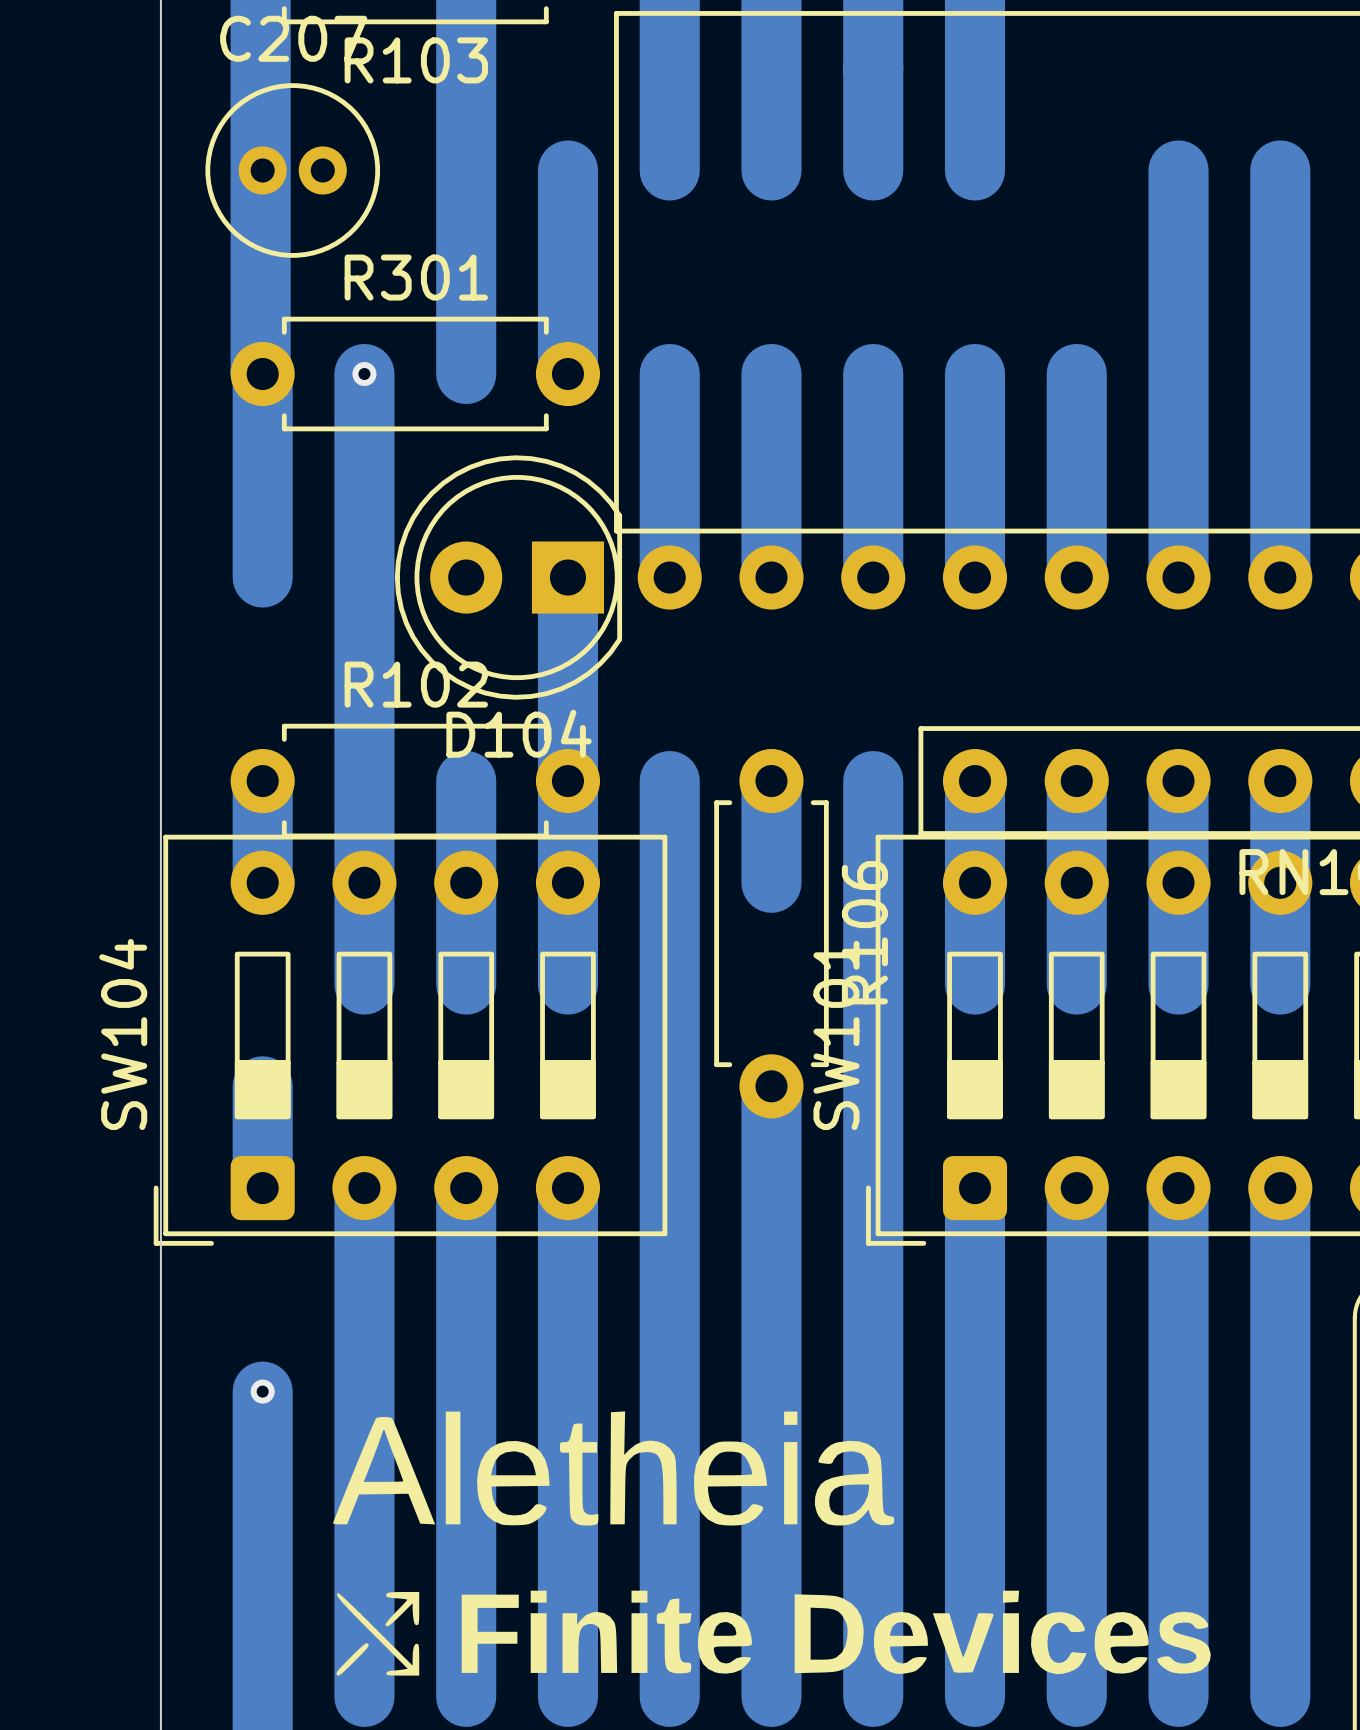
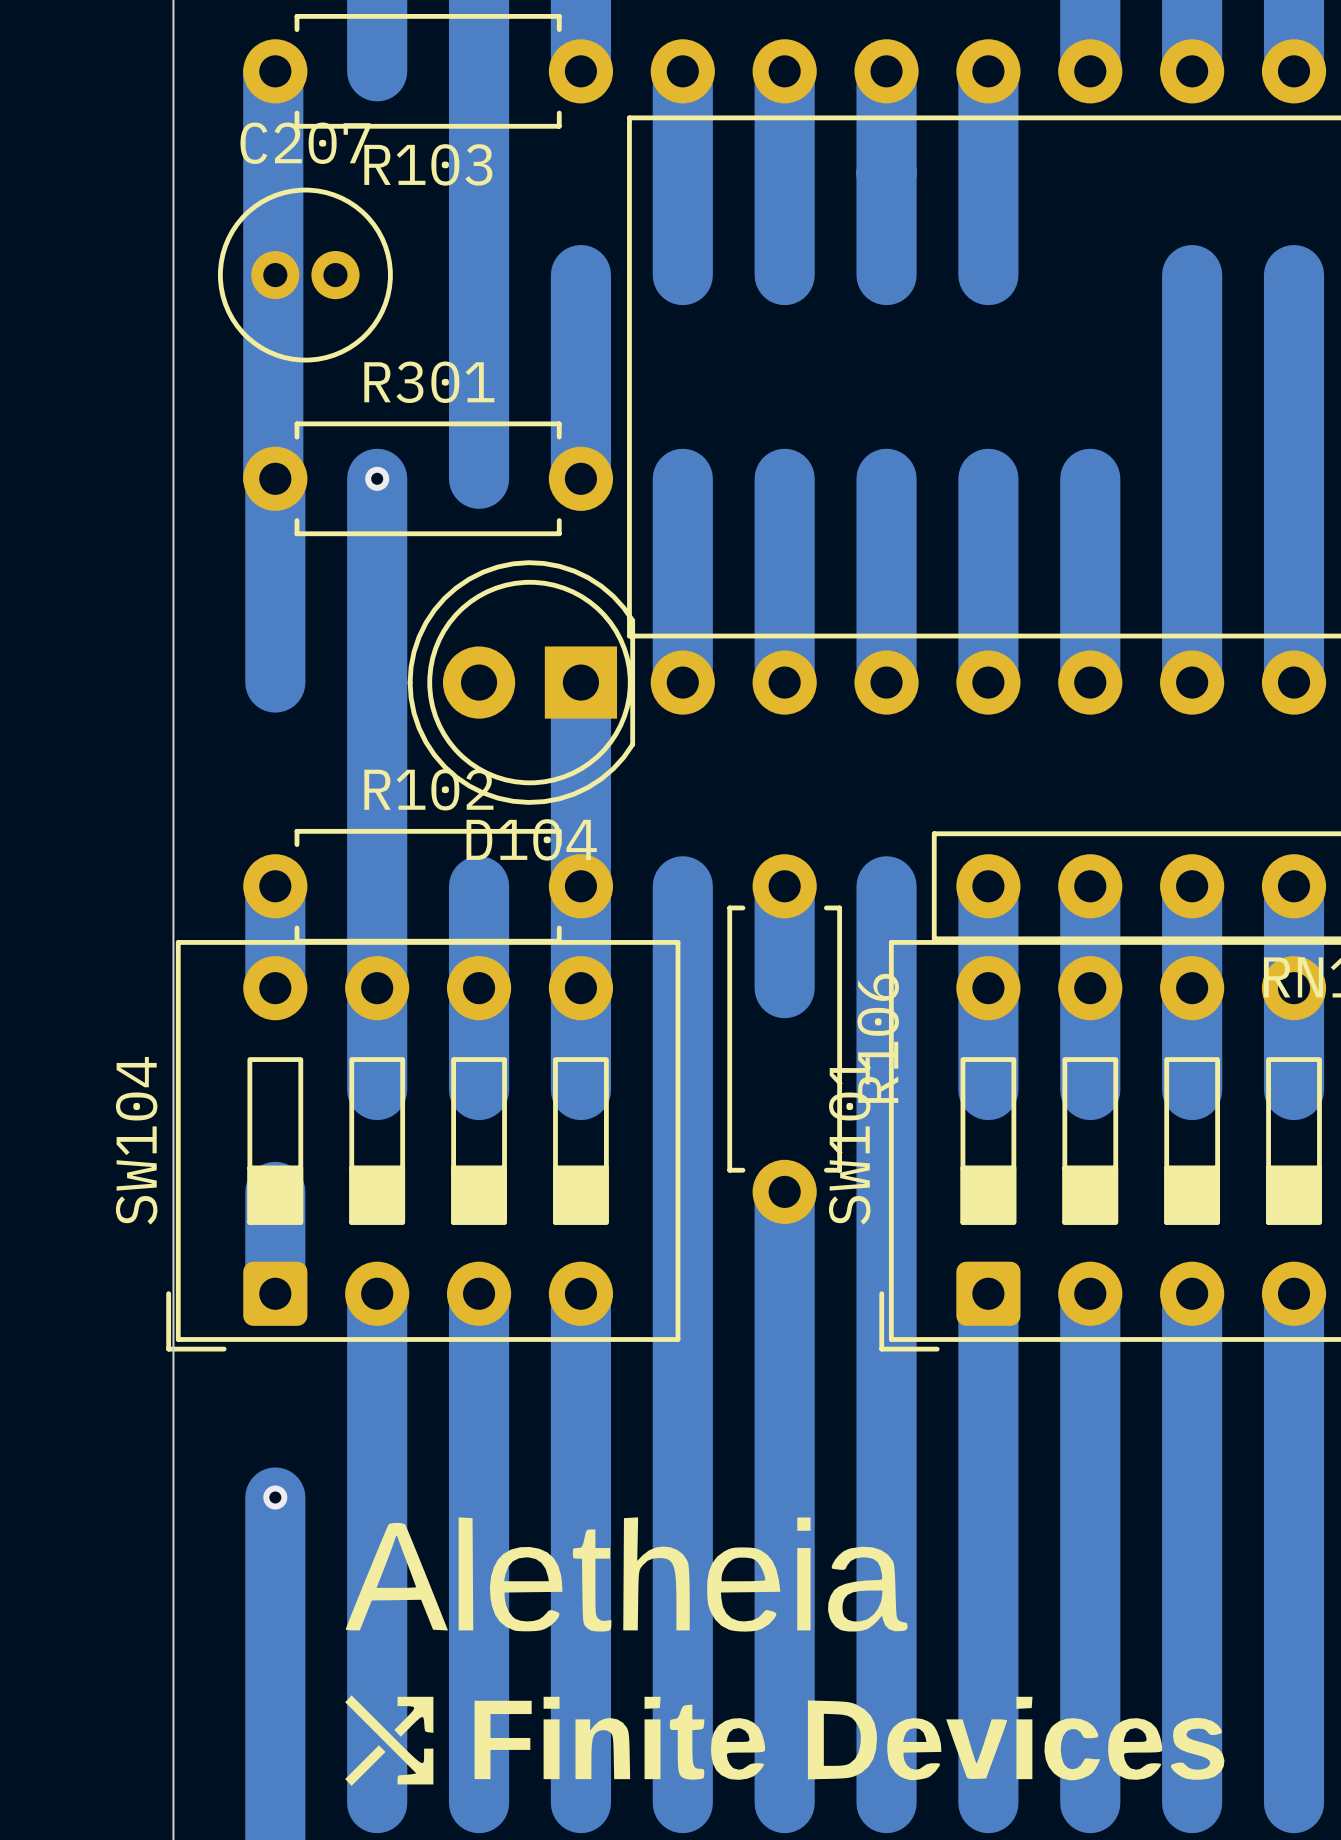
drawing shape: [332, 1411, 1211, 1676] -> [345, 1517, 1225, 1786]

